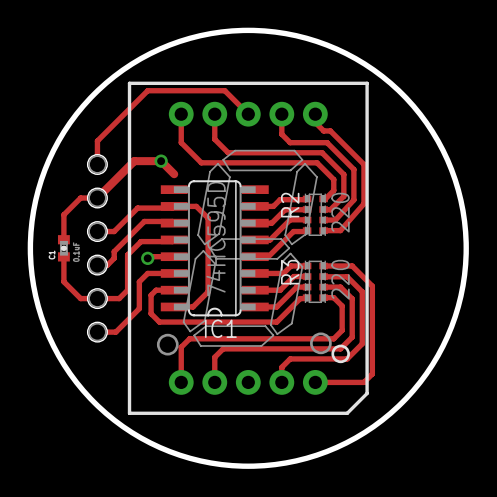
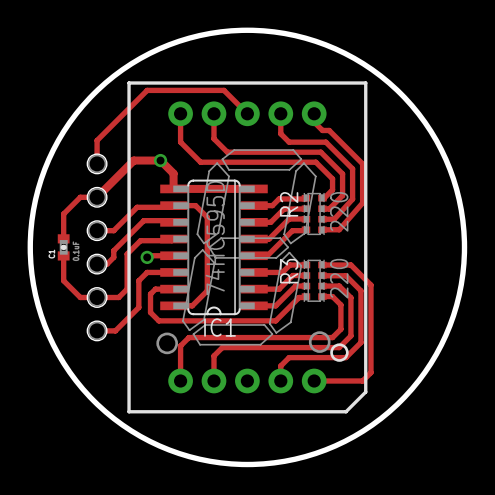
track: none -> (173, 173) (173, 188) (254, 188)

